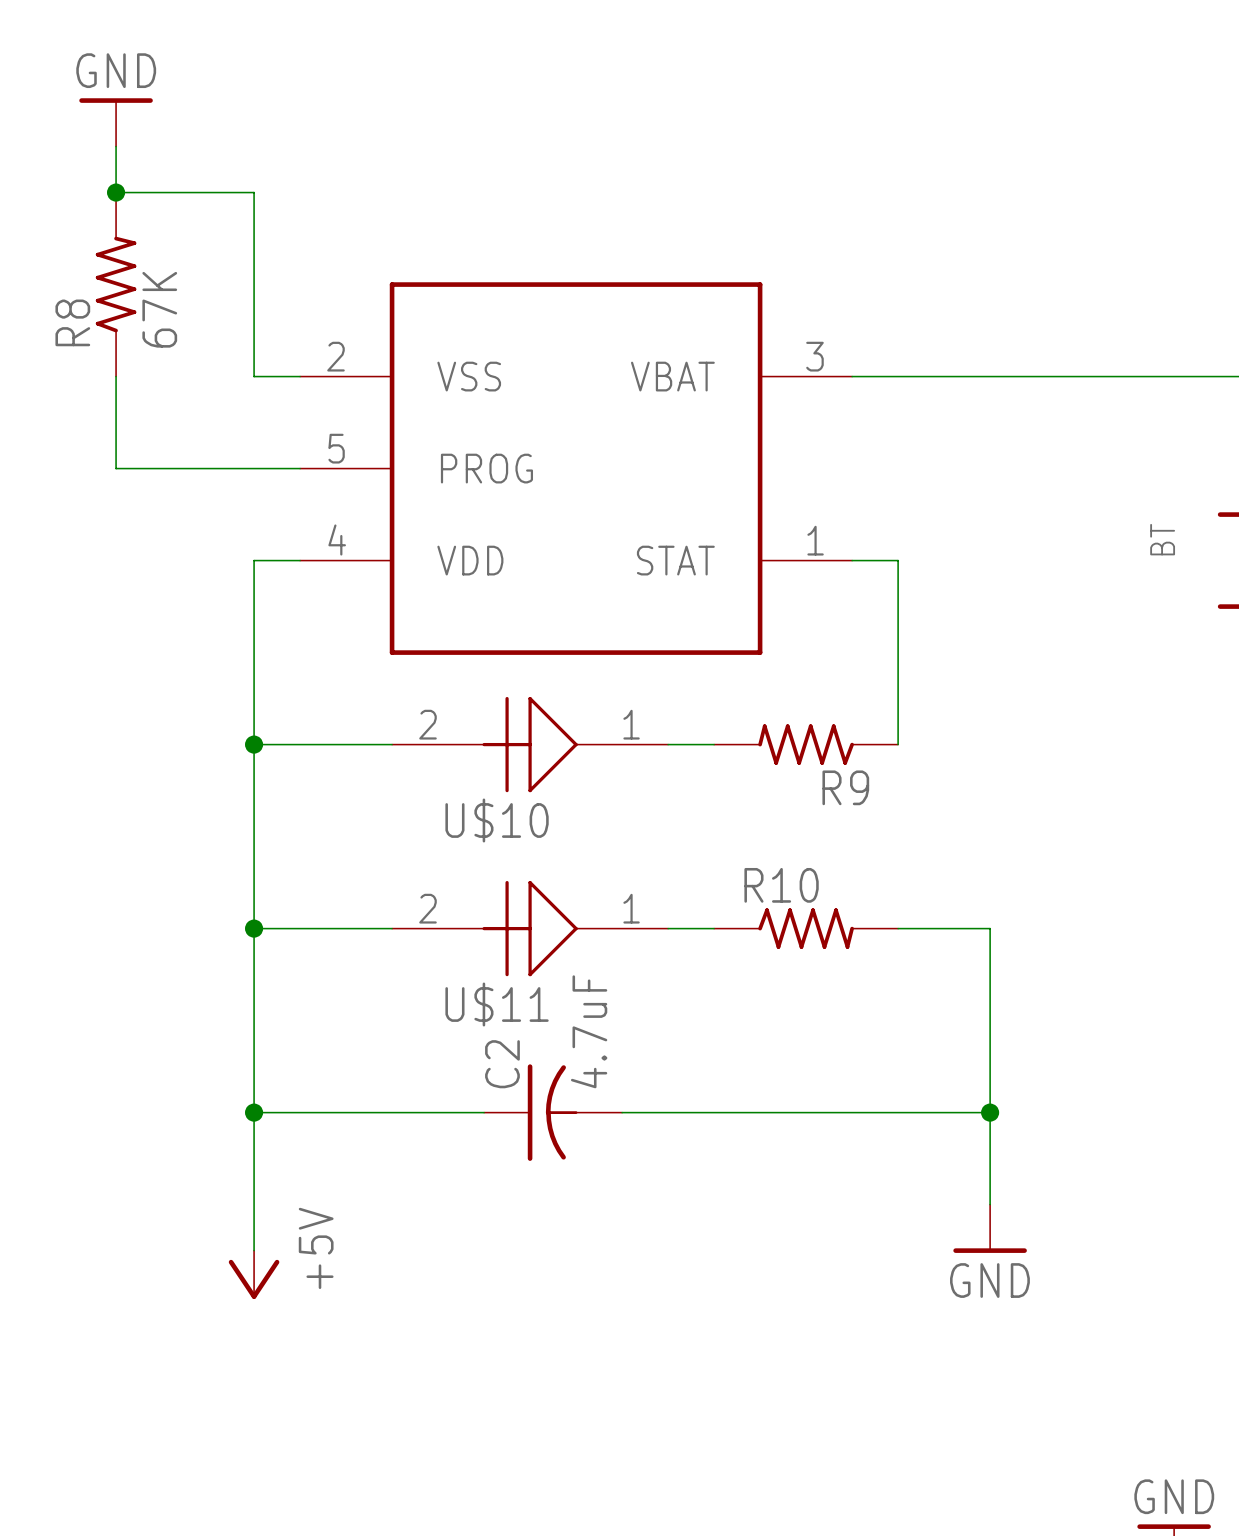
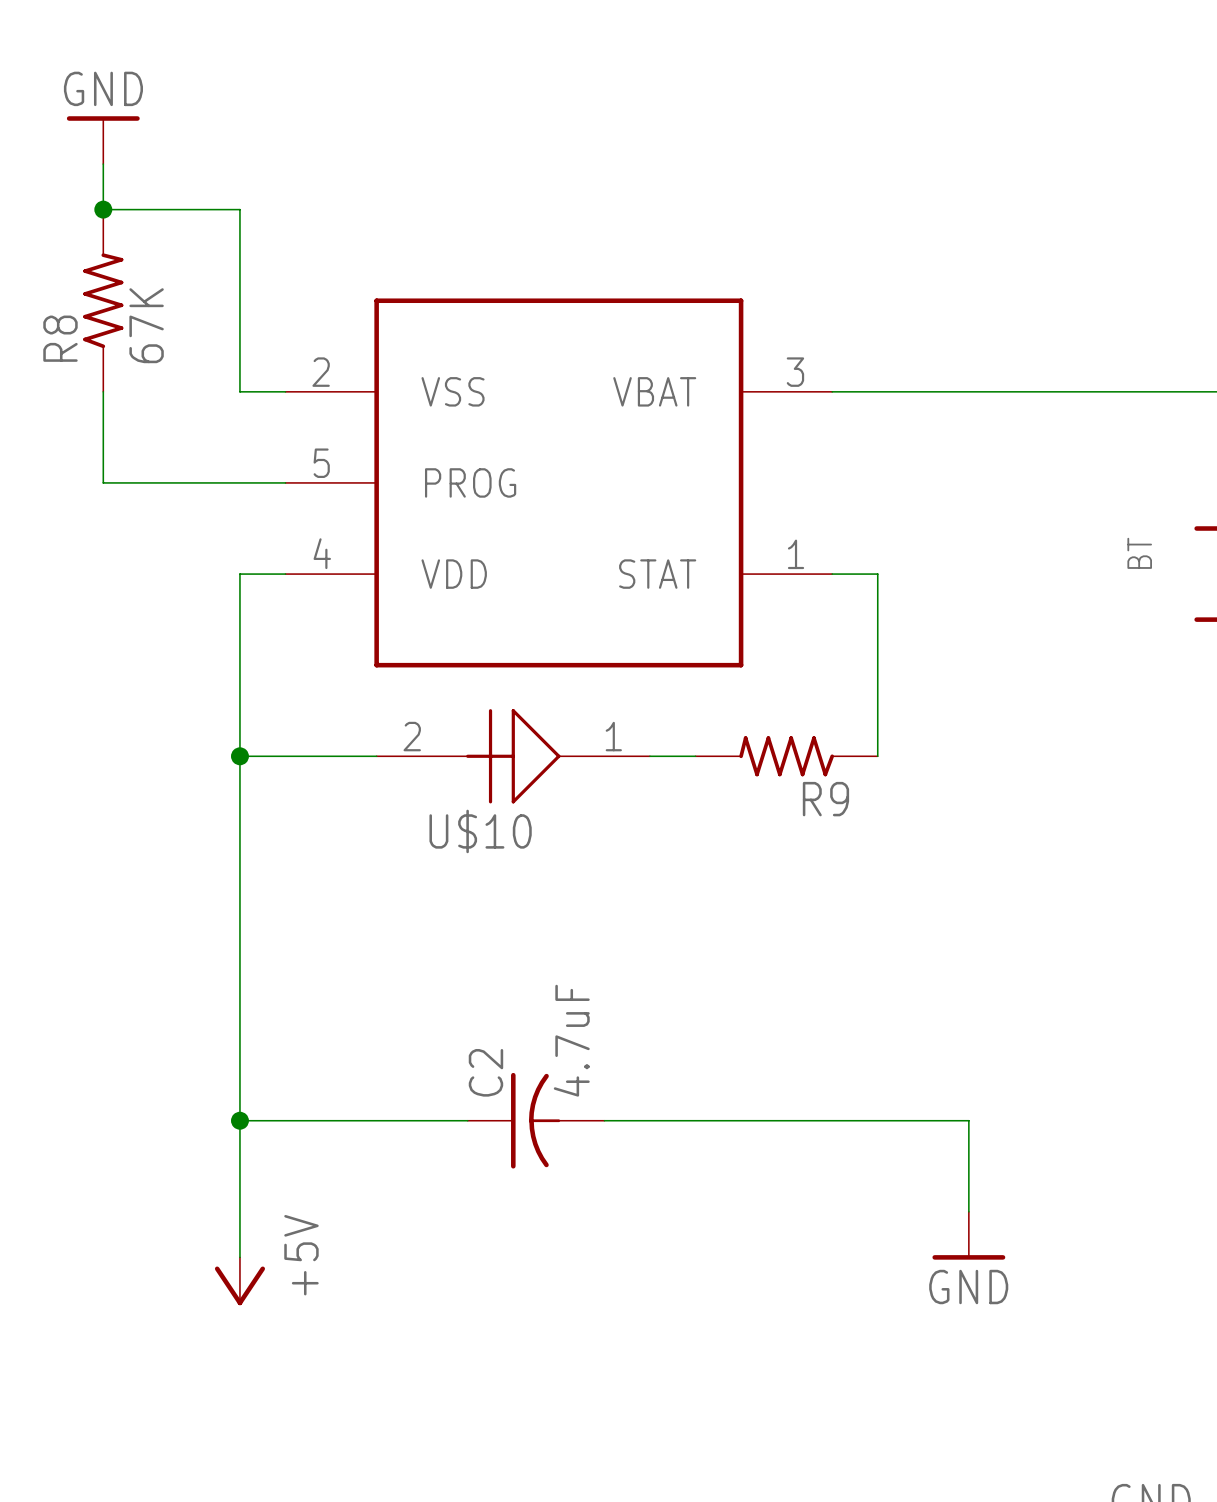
wire: (254, 928) (392, 928) -> none
junction: (254, 928) -> none
U$11: (530, 928) -> none
wire: (668, 928) (714, 928) -> none
R10: (806, 928) -> none
wire: (898, 928) (990, 928) (990, 1112) -> none
junction: (990, 1112) -> none

